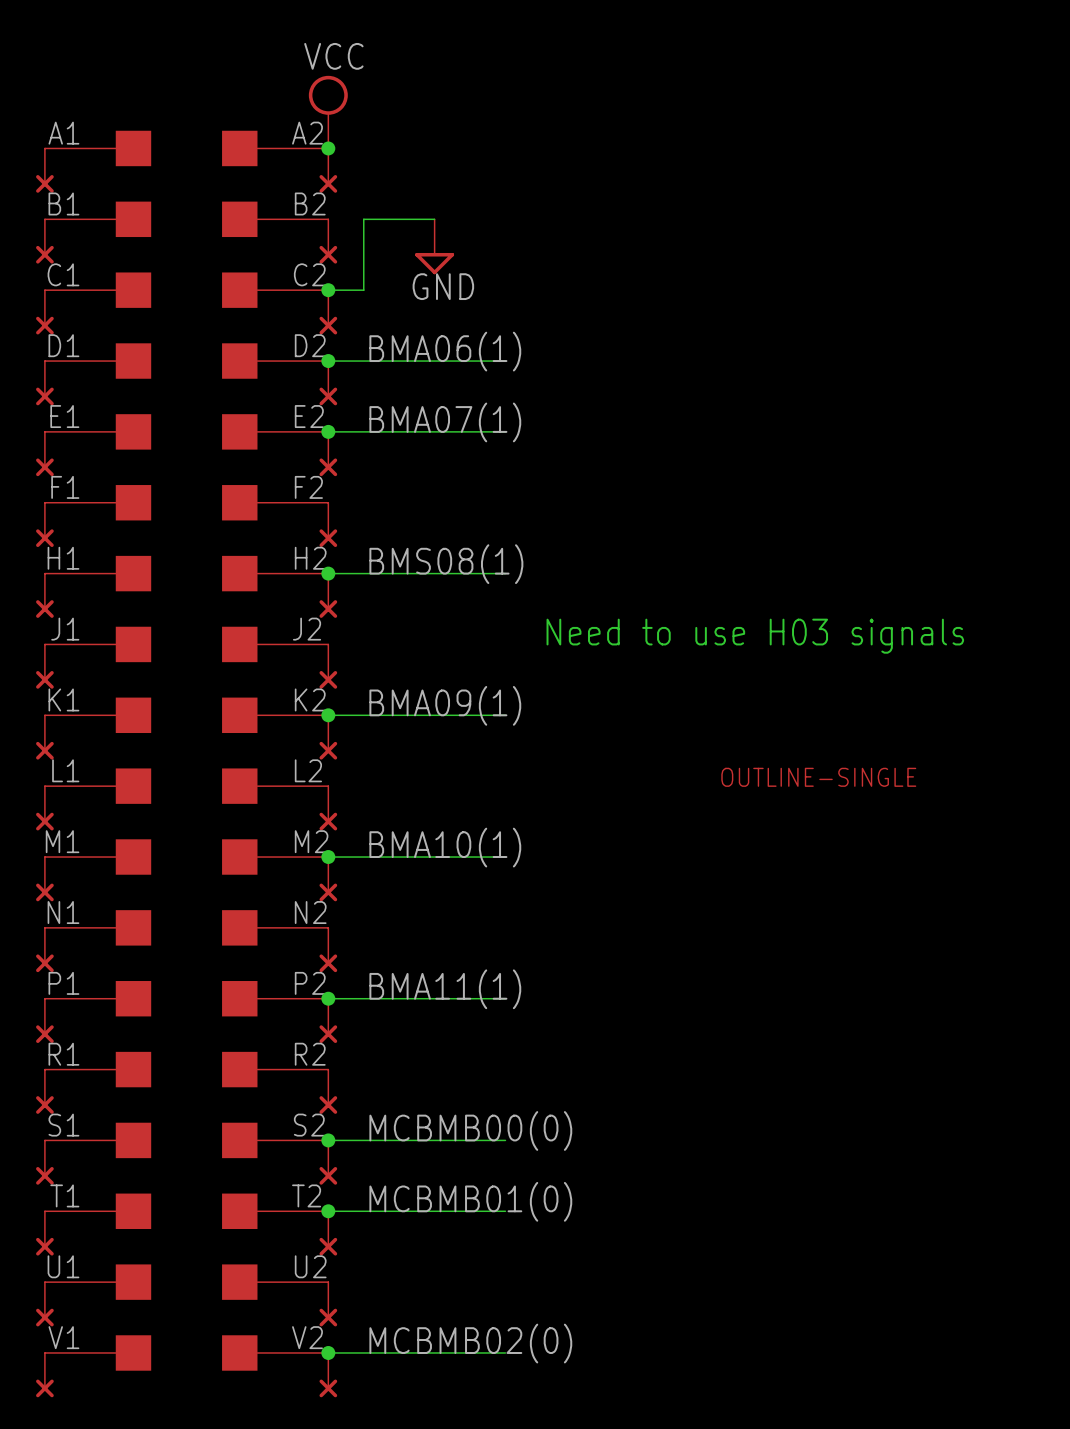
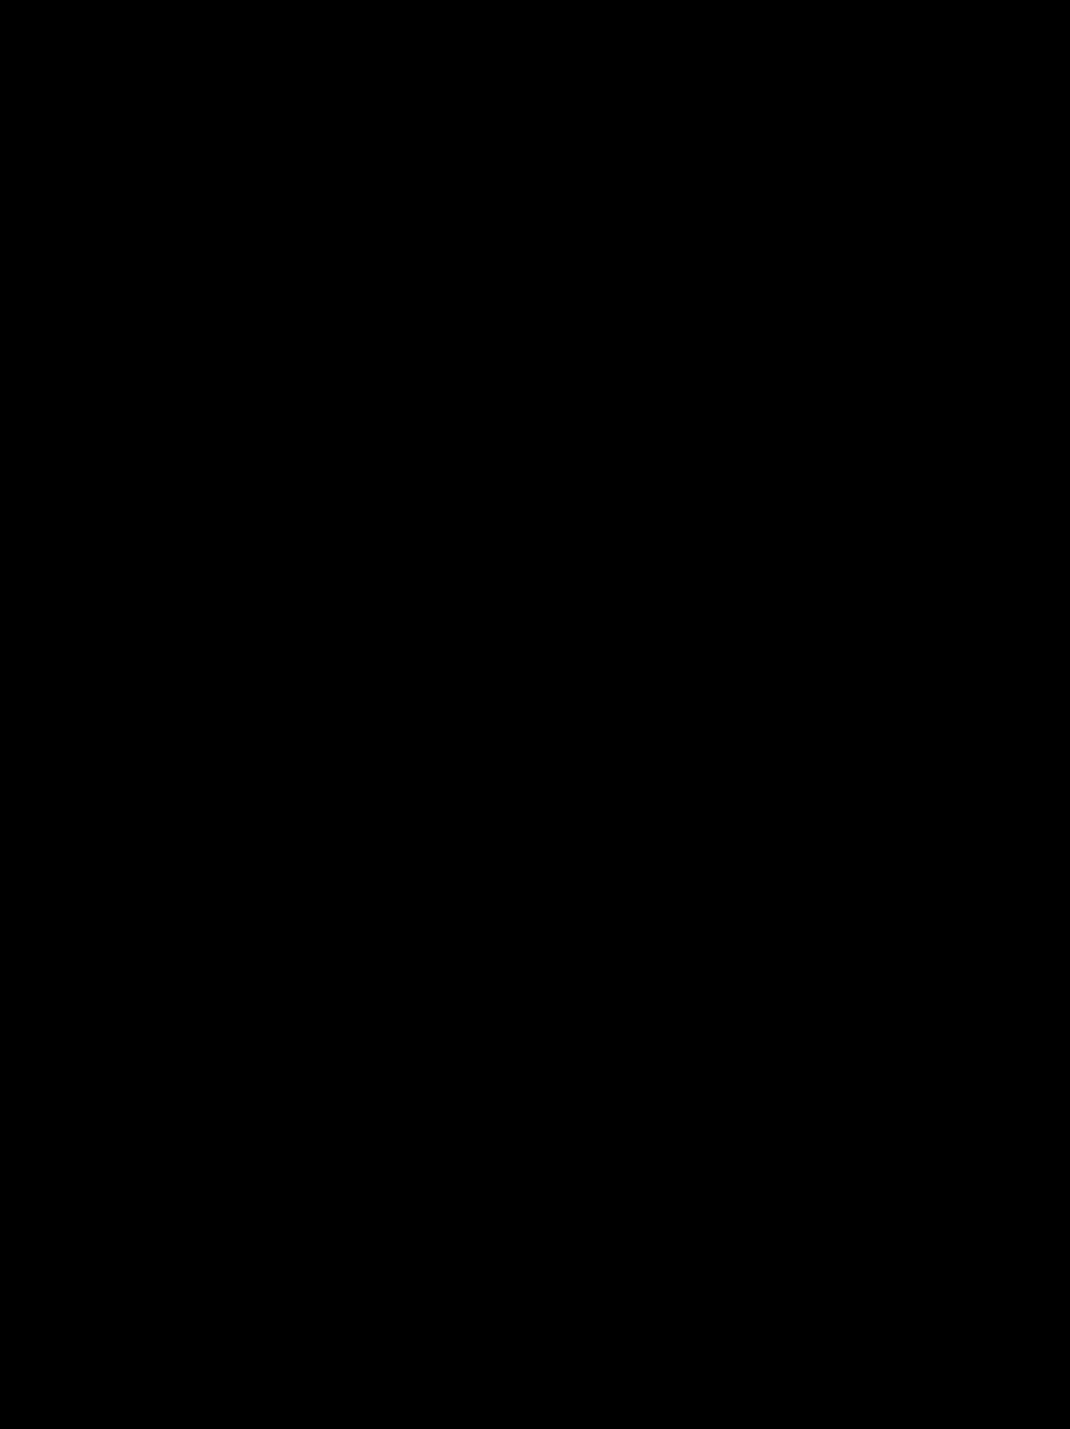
power symbol: VCC (328, 112) -> none
part: (98, 148) -> none
part: (275, 148) -> none
junction: (328, 148) -> none
part: (44, 170) -> none
part: (328, 170) -> none
part: (98, 219) -> none
part: (275, 219) -> none
wire: (434, 219) (363, 219) (363, 290) (328, 290) -> none
part: (44, 241) -> none
part: (328, 241) -> none
power symbol: GND (434, 246) -> none
part: (98, 290) -> none
part: (275, 290) -> none
junction: (328, 290) -> none
part: (44, 312) -> none
part: (328, 312) -> none
label: BMA06(1) (445, 351) -> none
part: (98, 361) -> none
part: (275, 361) -> none
wire: (328, 361) (505, 361) -> none
junction: (328, 361) -> none
part: (44, 383) -> none
part: (328, 383) -> none
label: BMA07(1) (445, 422) -> none
part: (98, 431) -> none
part: (275, 431) -> none
wire: (328, 431) (505, 431) -> none
junction: (328, 431) -> none
part: (44, 454) -> none
part: (328, 454) -> none
part: (98, 502) -> none
part: (275, 502) -> none
part: (44, 524) -> none
part: (328, 524) -> none
label: BMS08(1) (446, 564) -> none
part: (98, 573) -> none
part: (275, 573) -> none
wire: (328, 573) (505, 573) -> none
junction: (328, 573) -> none
part: (44, 595) -> none
part: (328, 595) -> none
text: Need to use H03 signals (755, 636) -> none
part: (98, 644) -> none
part: (275, 644) -> none
part: (44, 666) -> none
part: (328, 666) -> none
label: BMA09(1) (445, 705) -> none
part: (98, 715) -> none
part: (275, 715) -> none
wire: (328, 715) (505, 715) -> none
junction: (328, 715) -> none
part: (44, 737) -> none
part: (328, 737) -> none
part: OUTLINE-SINGLE (818, 777) -> none
part: (98, 786) -> none
part: (275, 786) -> none
part: (44, 808) -> none
part: (328, 808) -> none
label: BMA10(1) (445, 847) -> none
part: (98, 857) -> none
part: (275, 857) -> none
wire: (328, 857) (505, 857) -> none
junction: (328, 857) -> none
part: (44, 879) -> none
part: (328, 879) -> none
part: (98, 927) -> none
part: (275, 927) -> none
part: (44, 950) -> none
part: (328, 950) -> none
label: BMA11(1) (445, 989) -> none
part: (98, 998) -> none
part: (275, 998) -> none
wire: (328, 998) (505, 998) -> none
junction: (328, 998) -> none
part: (44, 1020) -> none
part: (328, 1020) -> none
part: (98, 1069) -> none
part: (275, 1069) -> none
part: (44, 1091) -> none
part: (328, 1091) -> none
label: MCBMB00(0) (470, 1130) -> none
part: (98, 1140) -> none
part: (275, 1140) -> none
wire: (328, 1140) (505, 1140) -> none
junction: (328, 1140) -> none
part: (44, 1162) -> none
part: (328, 1162) -> none
label: MCBMB01(0) (470, 1201) -> none
part: (98, 1211) -> none
part: (275, 1211) -> none
wire: (328, 1211) (505, 1211) -> none
junction: (328, 1211) -> none
part: (44, 1233) -> none
part: (328, 1233) -> none
part: (98, 1282) -> none
part: (275, 1282) -> none
part: (44, 1304) -> none
part: (328, 1304) -> none
label: MCBMB02(0) (470, 1343) -> none
part: (98, 1352) -> none
part: (275, 1352) -> none
wire: (328, 1352) (505, 1352) -> none
junction: (328, 1352) -> none
part: (44, 1375) -> none
part: (328, 1375) -> none

